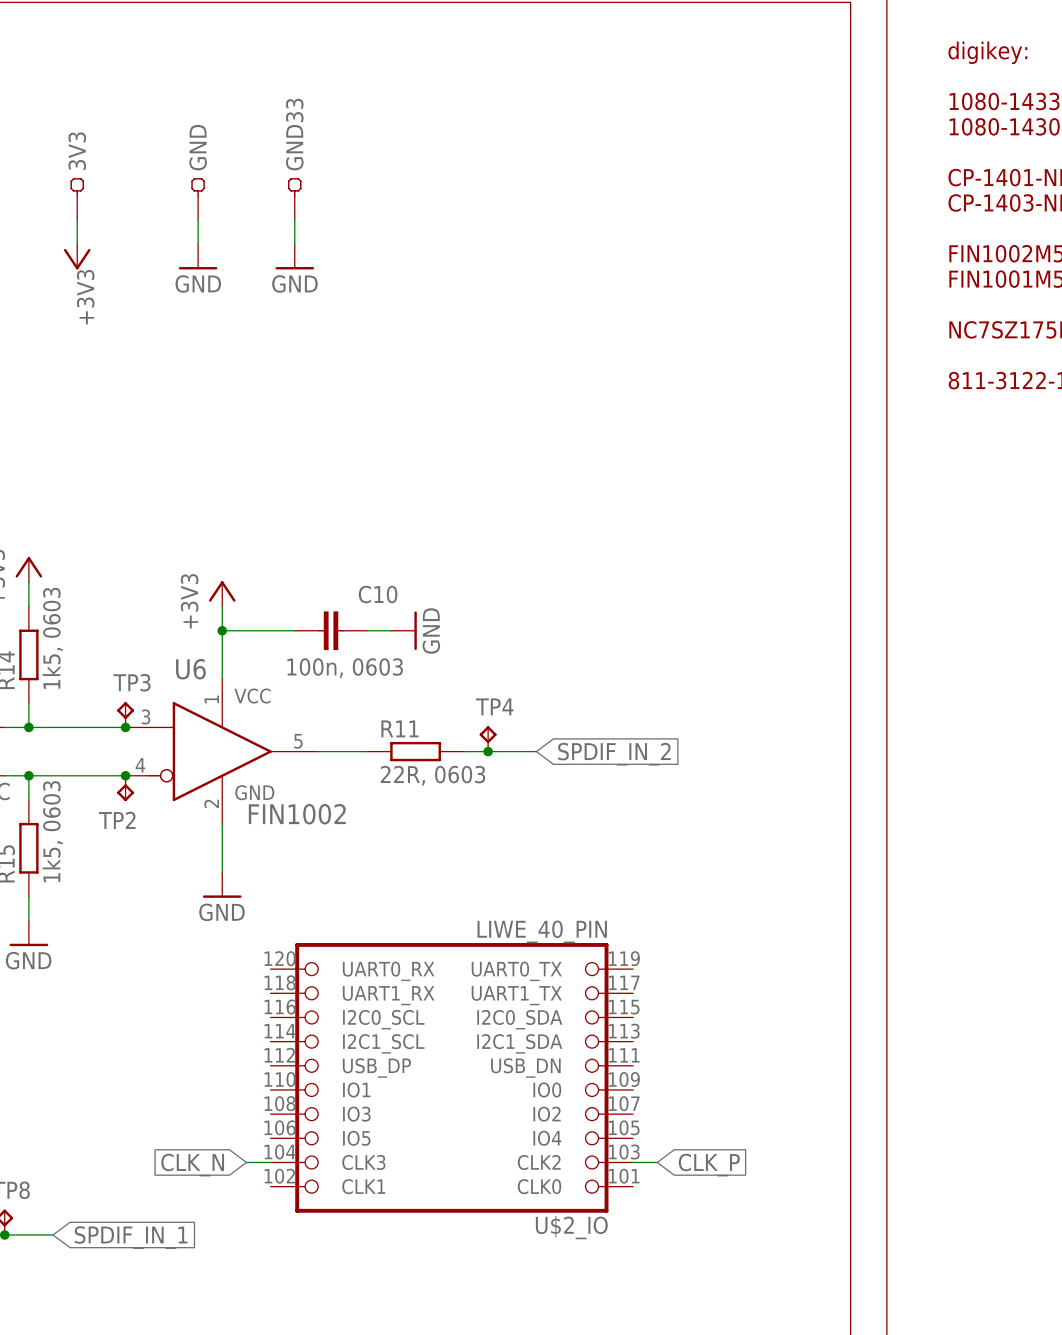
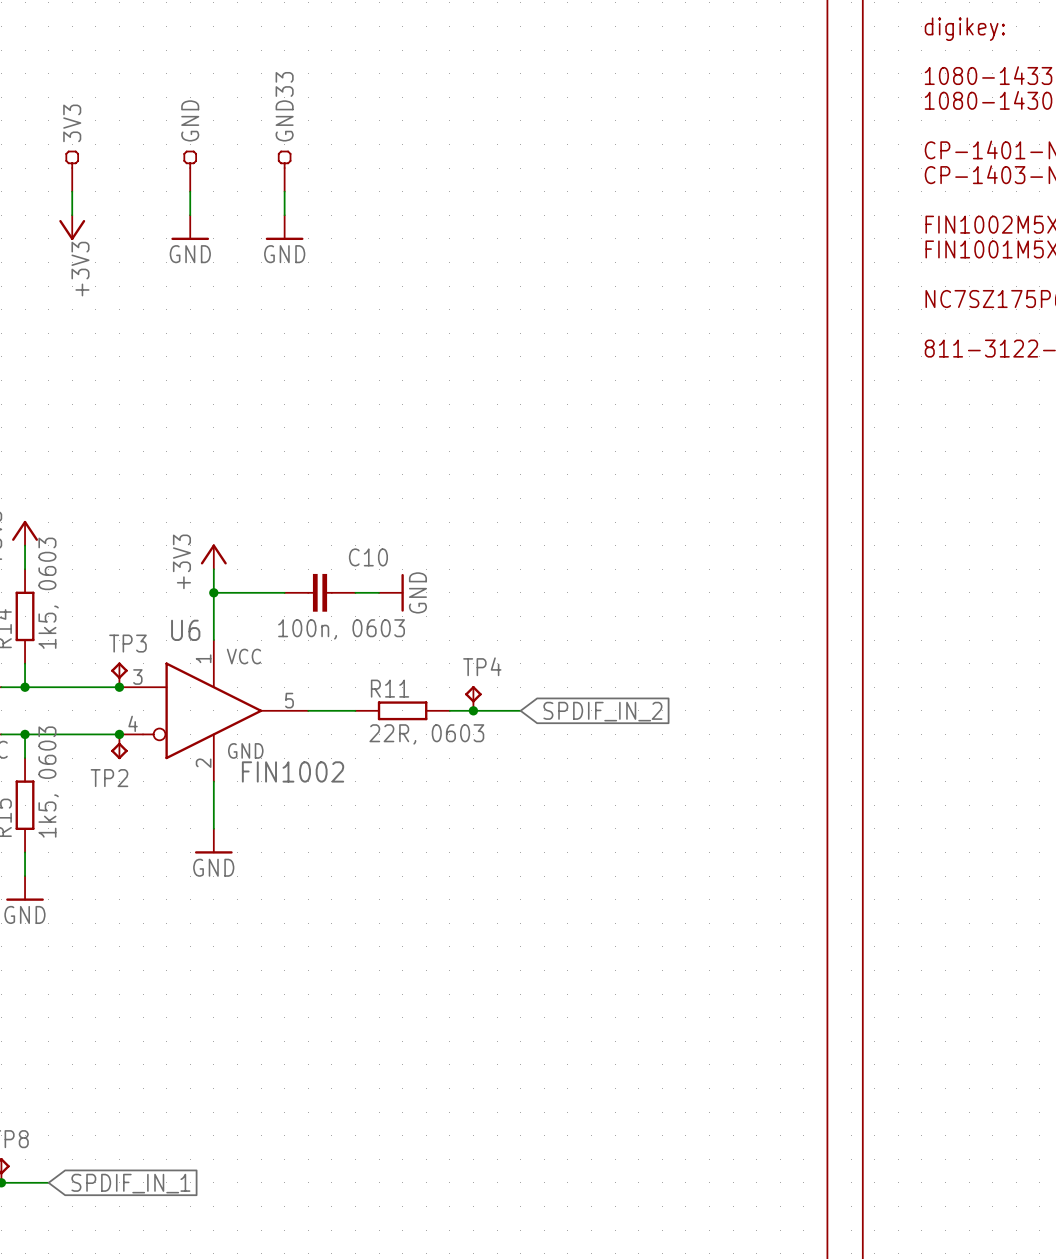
U$2_IO: LIWE_40_PIN (451, 1077) -> none
wire: (246, 1162) (270, 1162) -> none
wire: (633, 1162) (657, 1162) -> none
global label: CLK_N (192, 1165) -> none
global label: CLK_P (709, 1165) -> none

